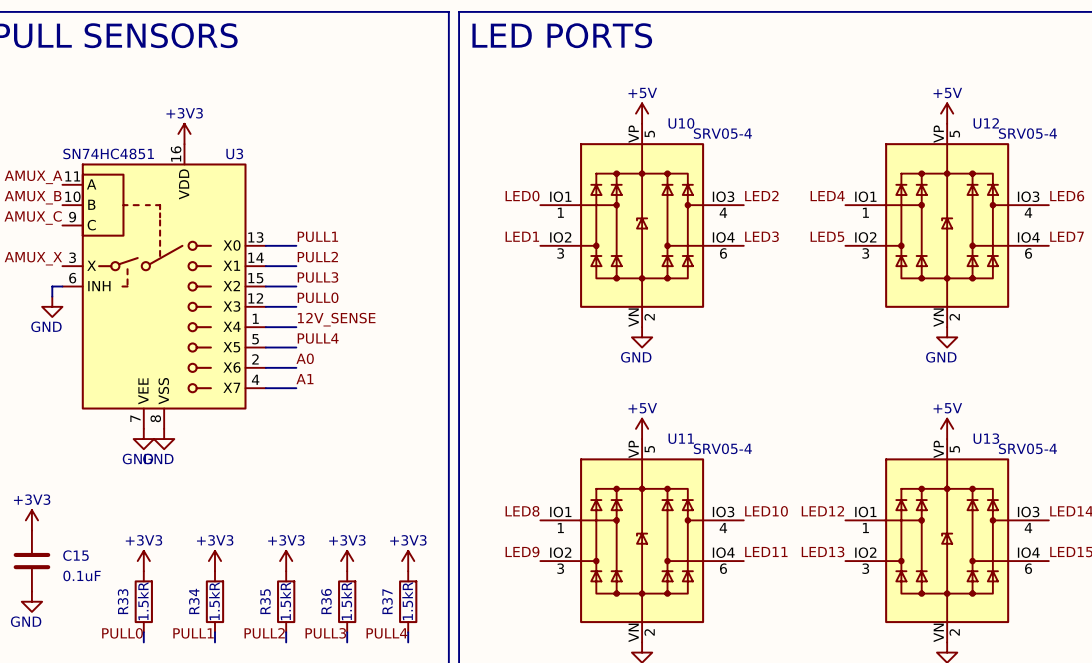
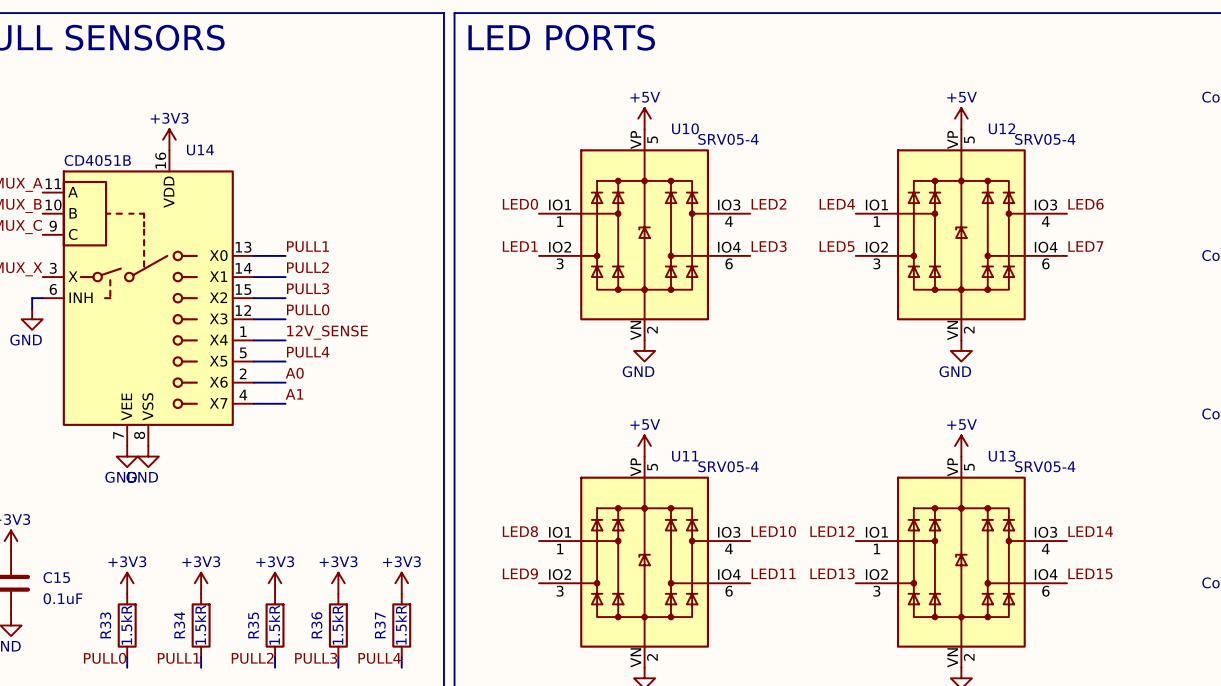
U3 value: SN74HC4851 (108, 153) -> CD4051B (97, 160)
U3 name: U3 (234, 153) -> U14 (200, 150)

